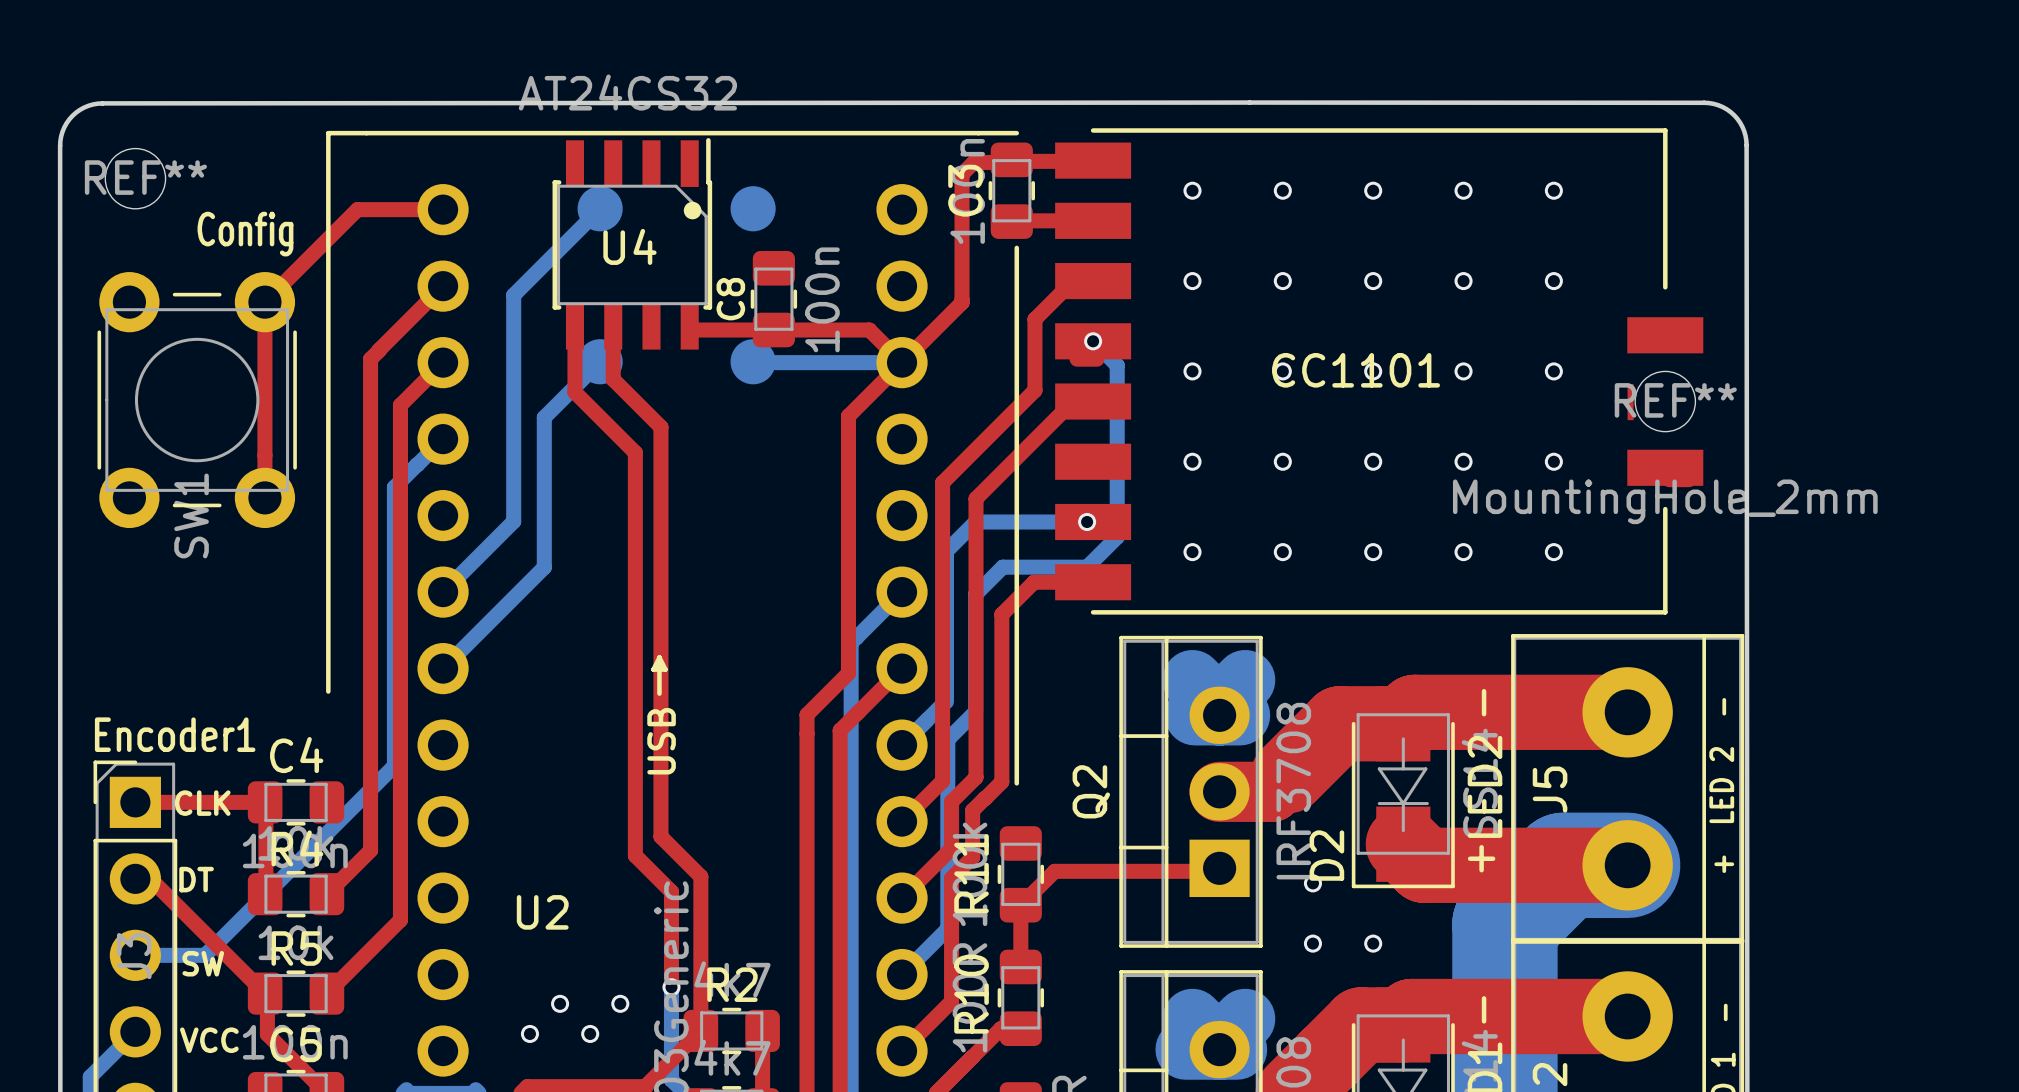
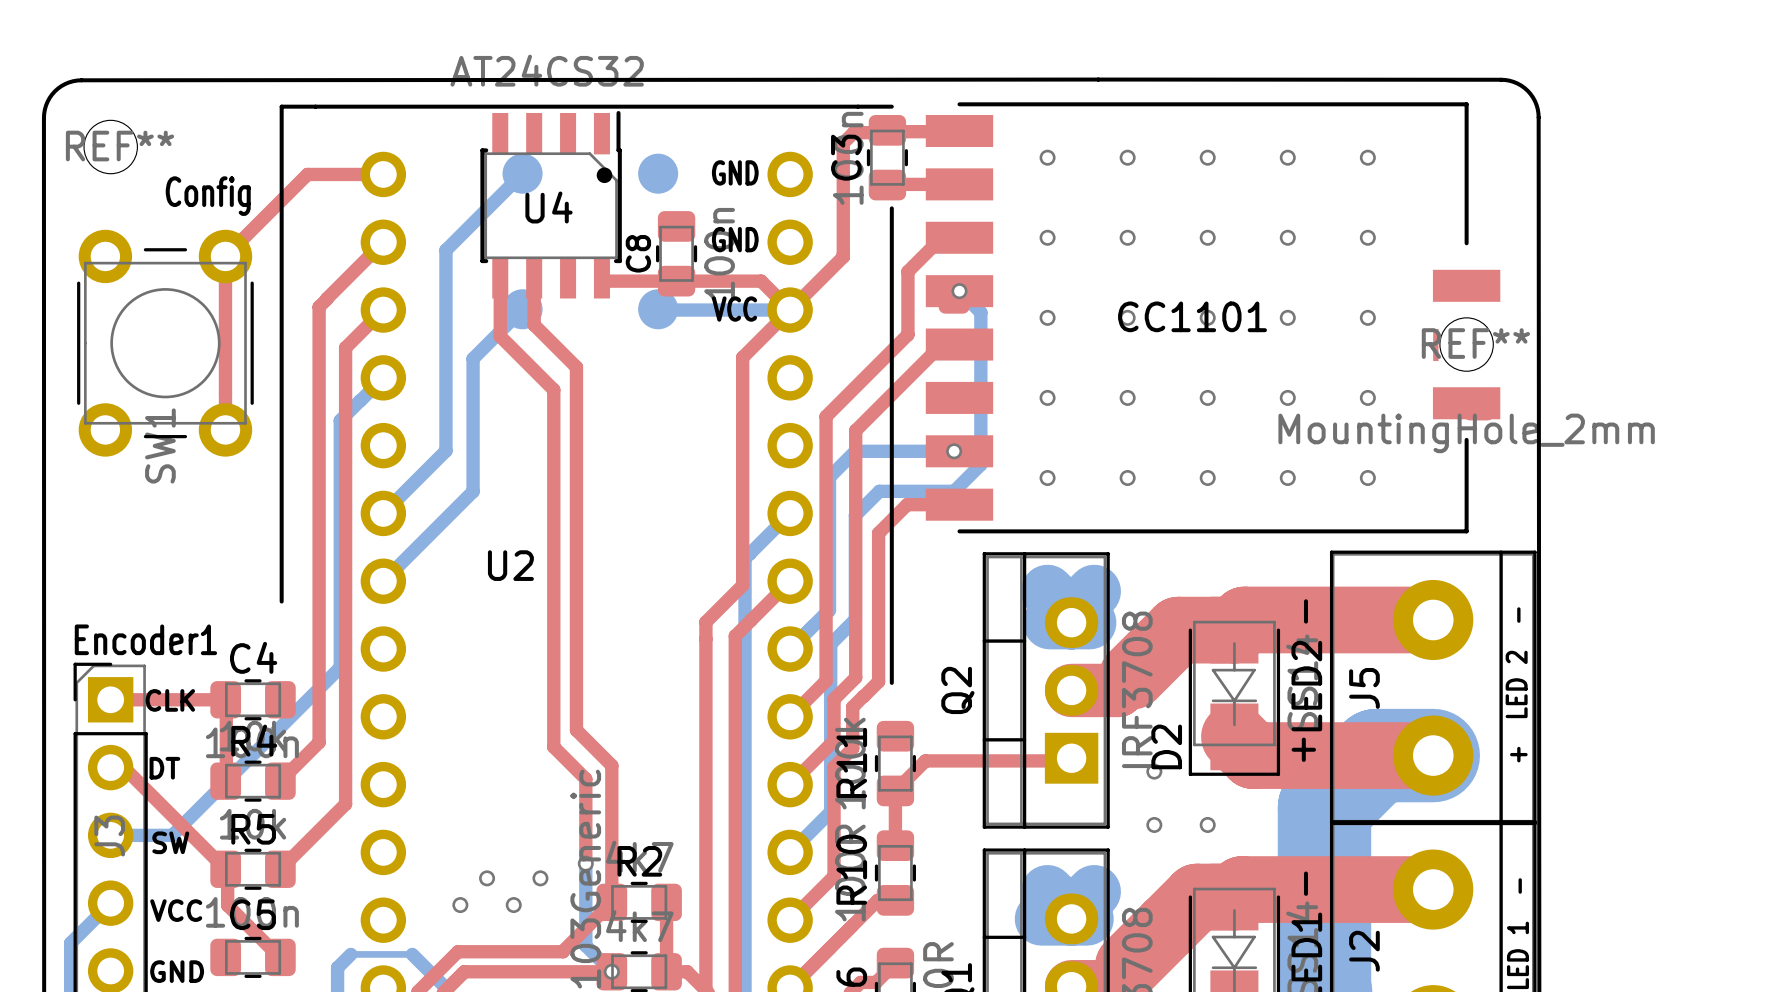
text: none -> GND (735, 172)
text: none -> GND (735, 239)
text: none -> VCC (734, 309)
line: (659, 657) (665, 669) (653, 669) (659, 657) -> none
line: (659, 657) (659, 693) -> none
text: USB (661, 741) -> none
U2 name position: U2 (542, 912) -> U2 (510, 565)

